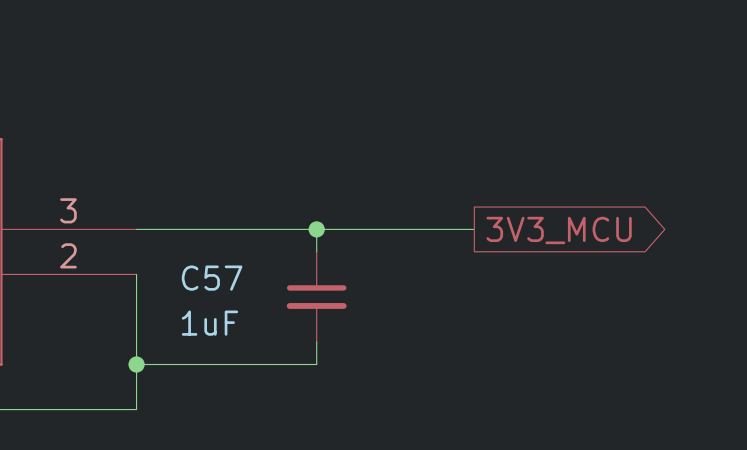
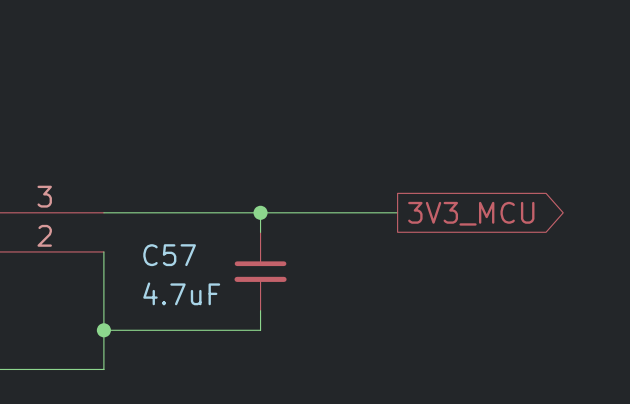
C57 value: 1uF (209, 323) -> 4.7uF (181, 293)

